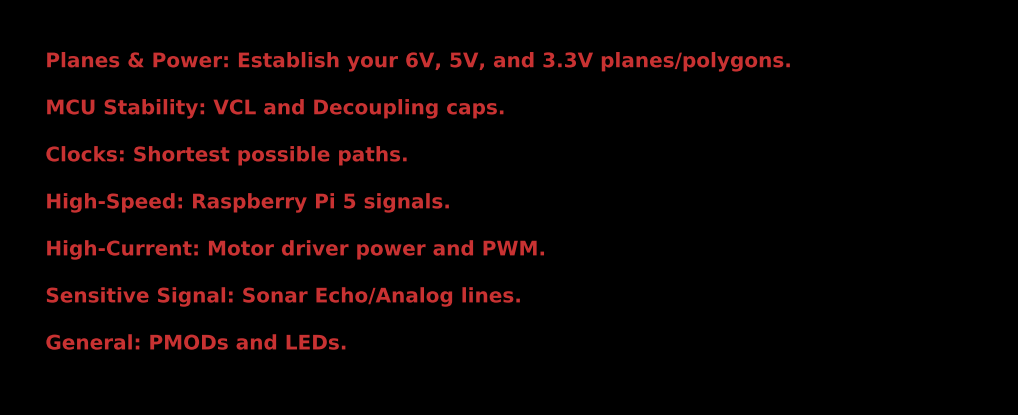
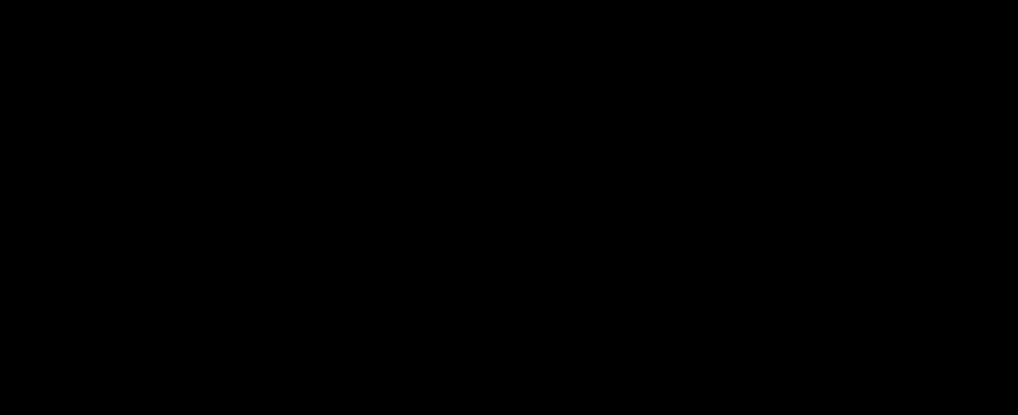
text: Planes & Power: Establish your 6V, 5V, and 3.3V planes/polygons. (418, 61) -> none
text: MCU Stability: VCL and Decoupling caps. (275, 108) -> none
text: Clocks: Shortest possible paths. (226, 155) -> none
text: High-Speed: Raspberry Pi 5 signals. (248, 202) -> none
text: High-Current: Motor driver power and PWM. (295, 249) -> none
text: Sensitive Signal: Sonar Echo/Analog lines. (283, 296) -> none
text: General: PMODs and LEDs. (195, 341) -> none

